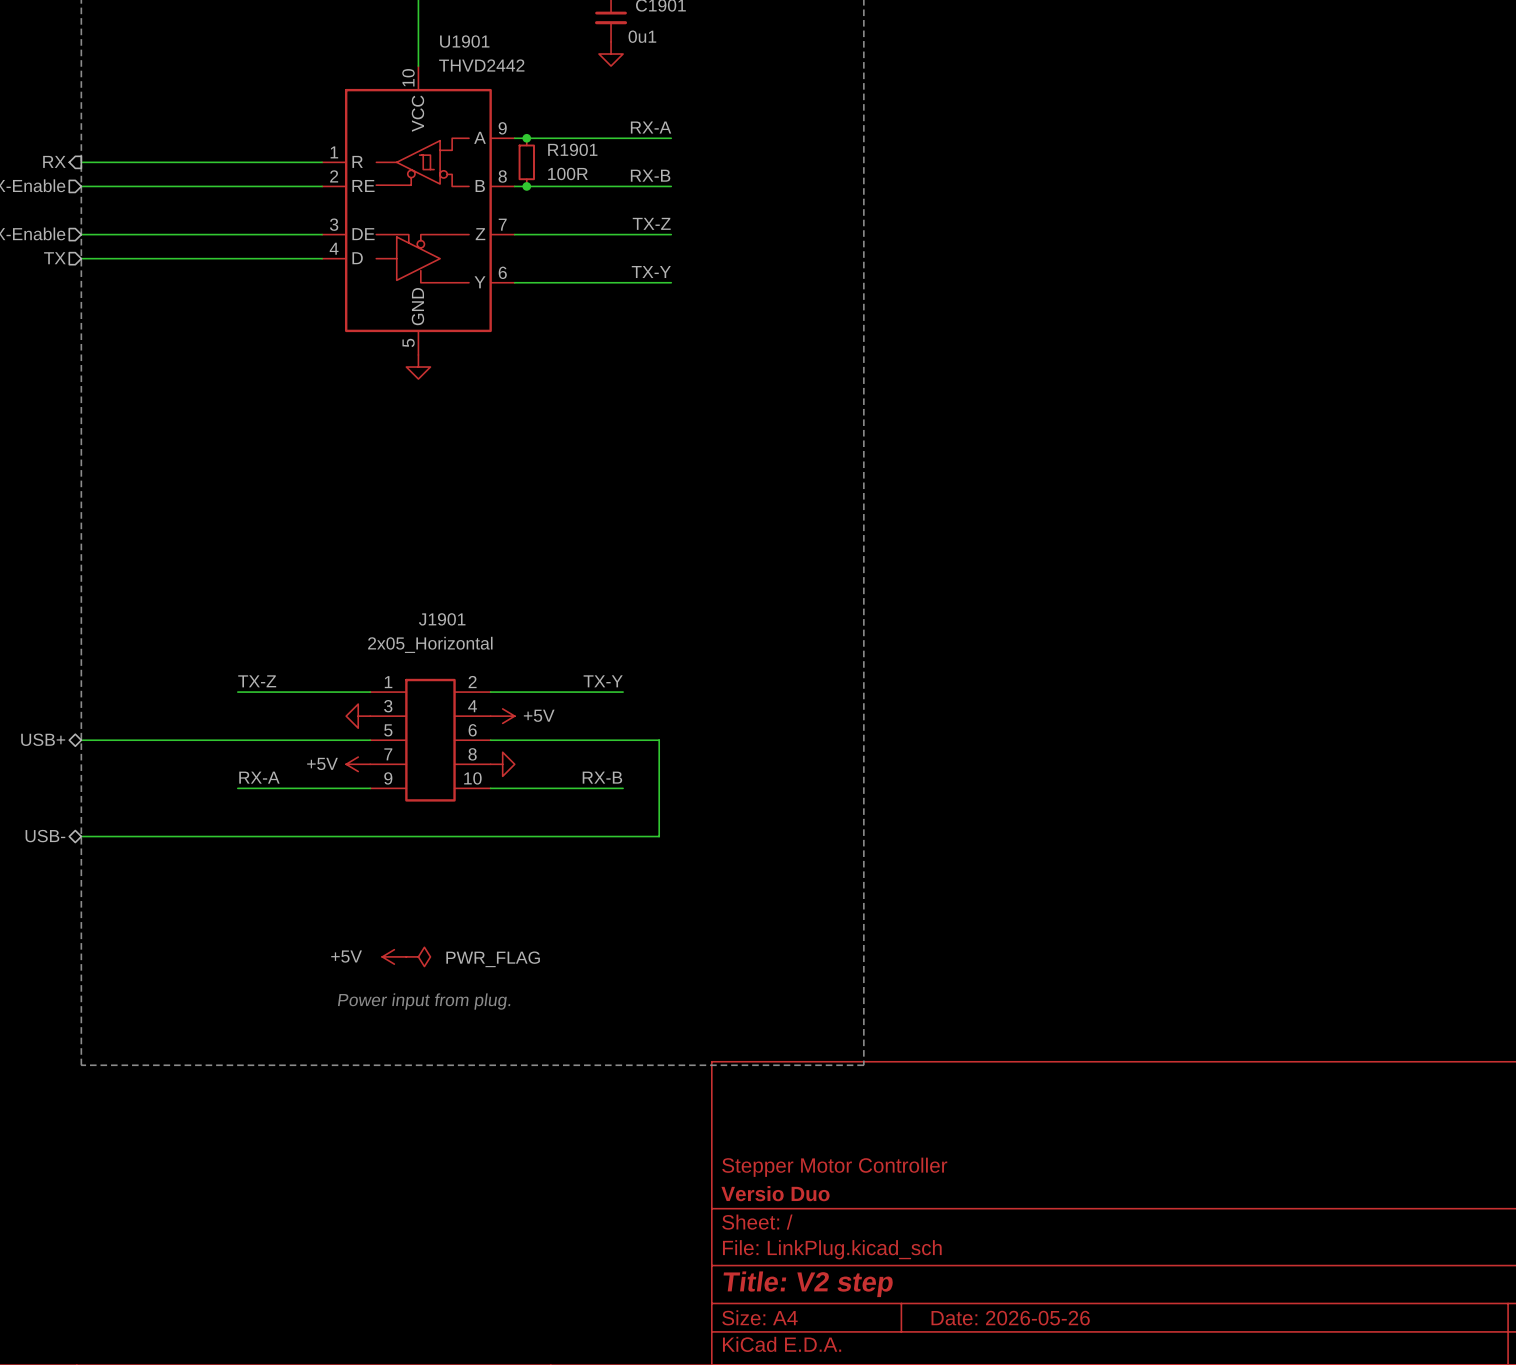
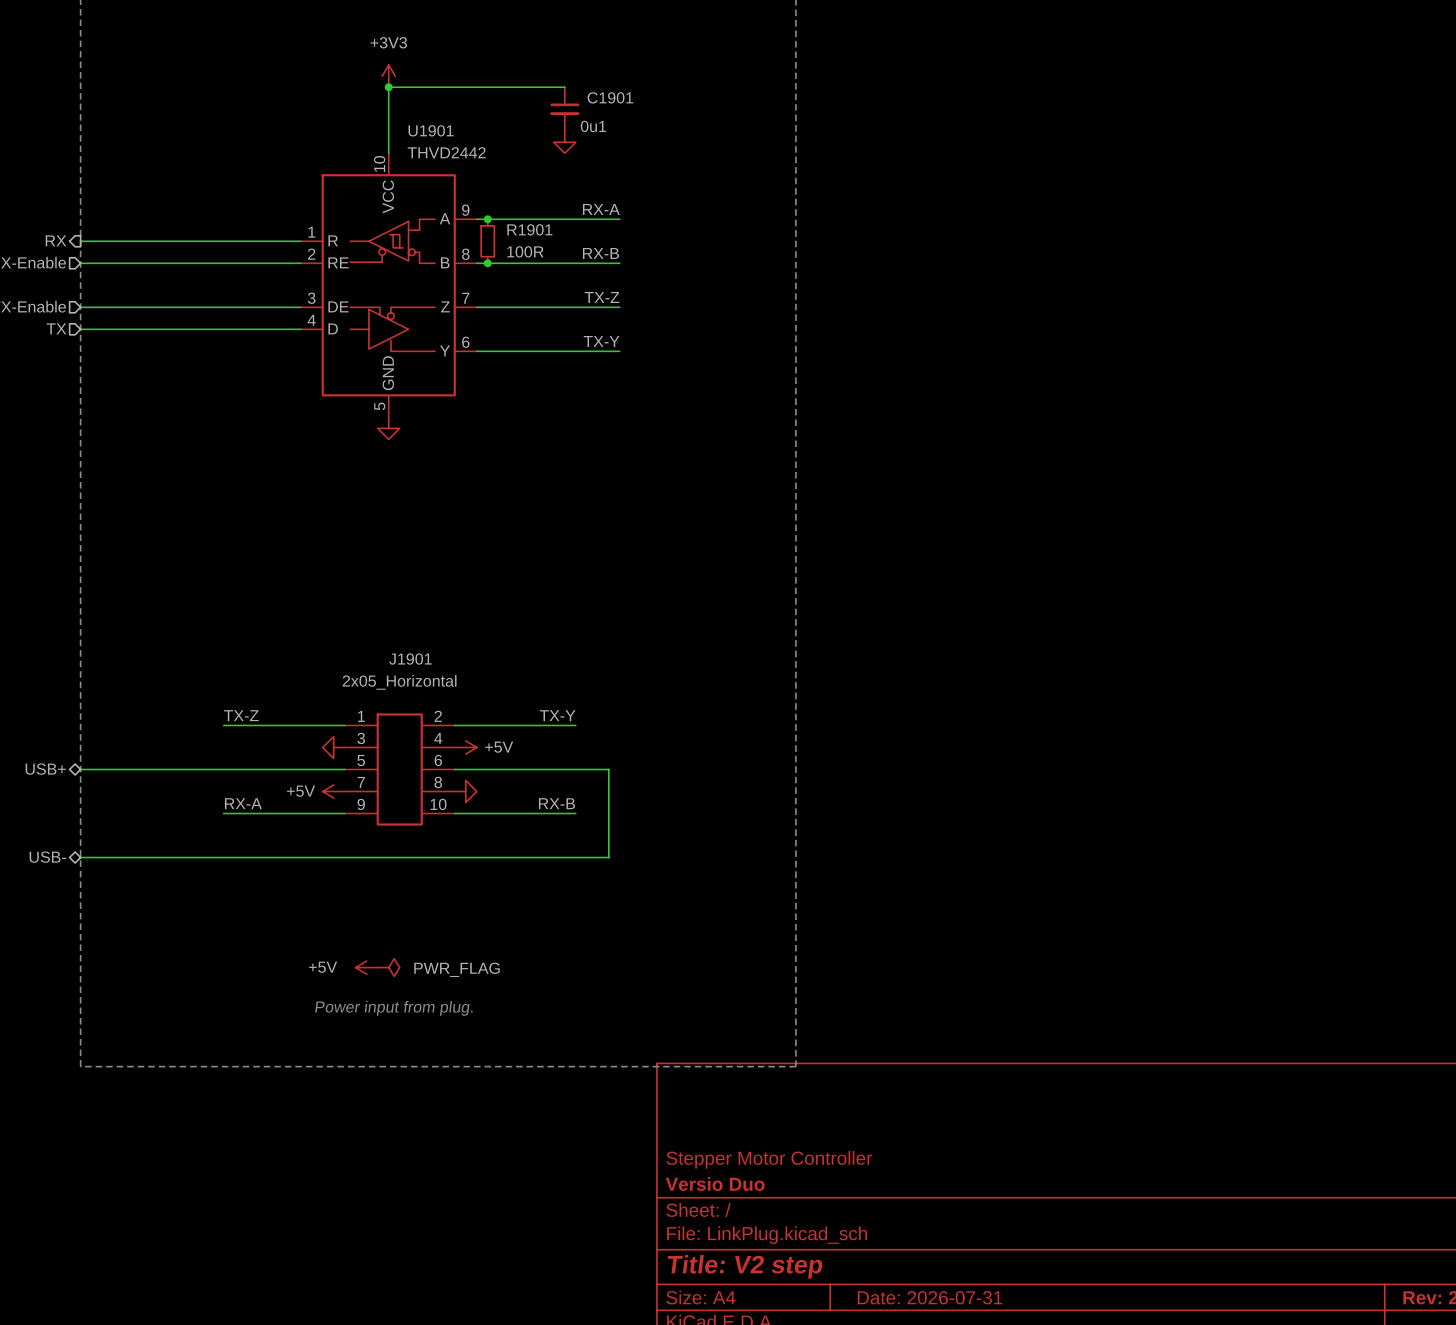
title block: Date: 2026-05-26 (1010, 1318) -> Date: 2026-07-31 (930, 1297)

